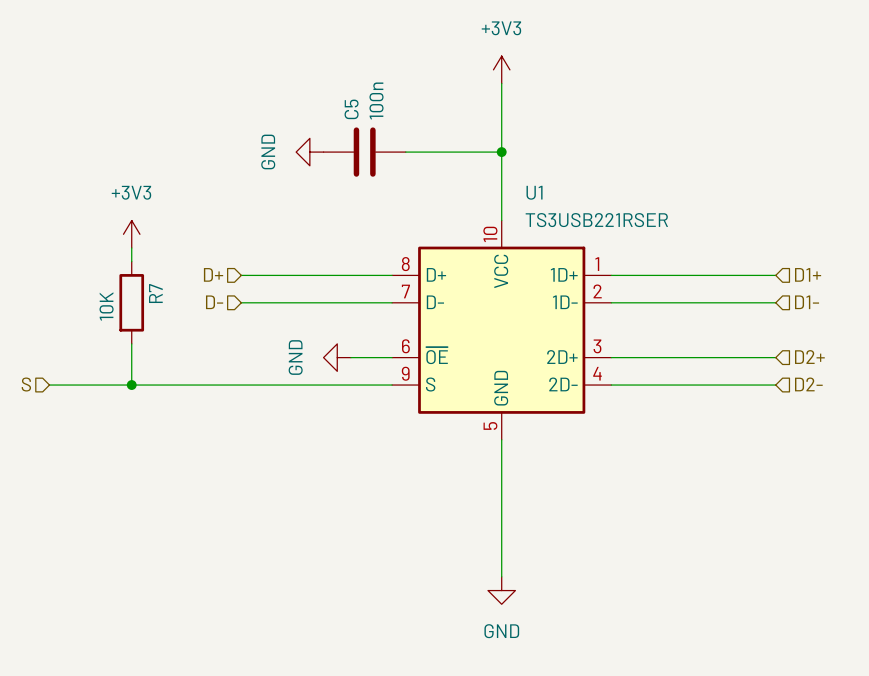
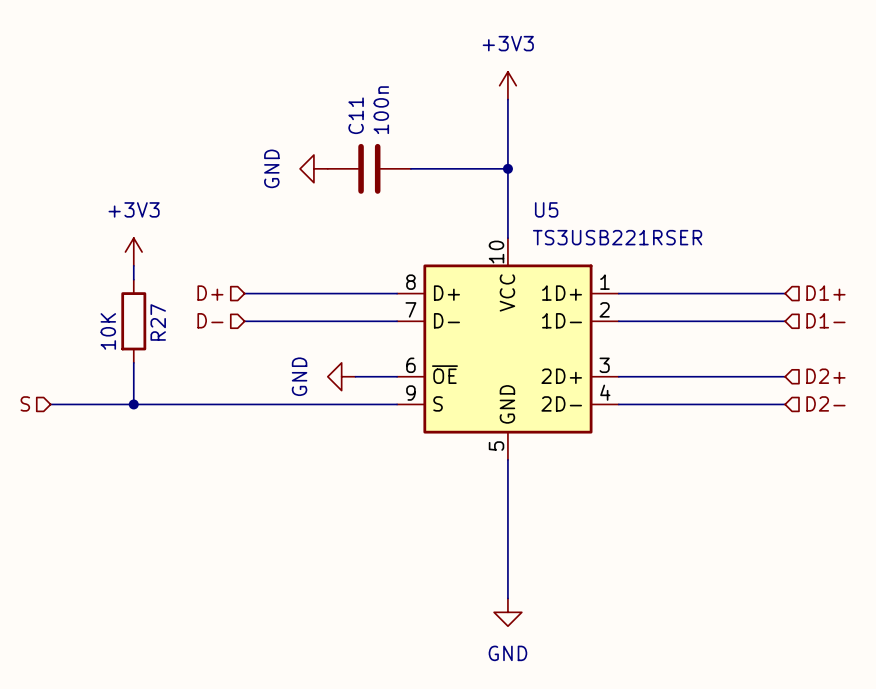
C5 name: C5 (351, 109) -> C11 (356, 115)
U1 name: U1 (534, 192) -> U5 (546, 209)
R7 name: R7 (155, 293) -> R27 (158, 322)

